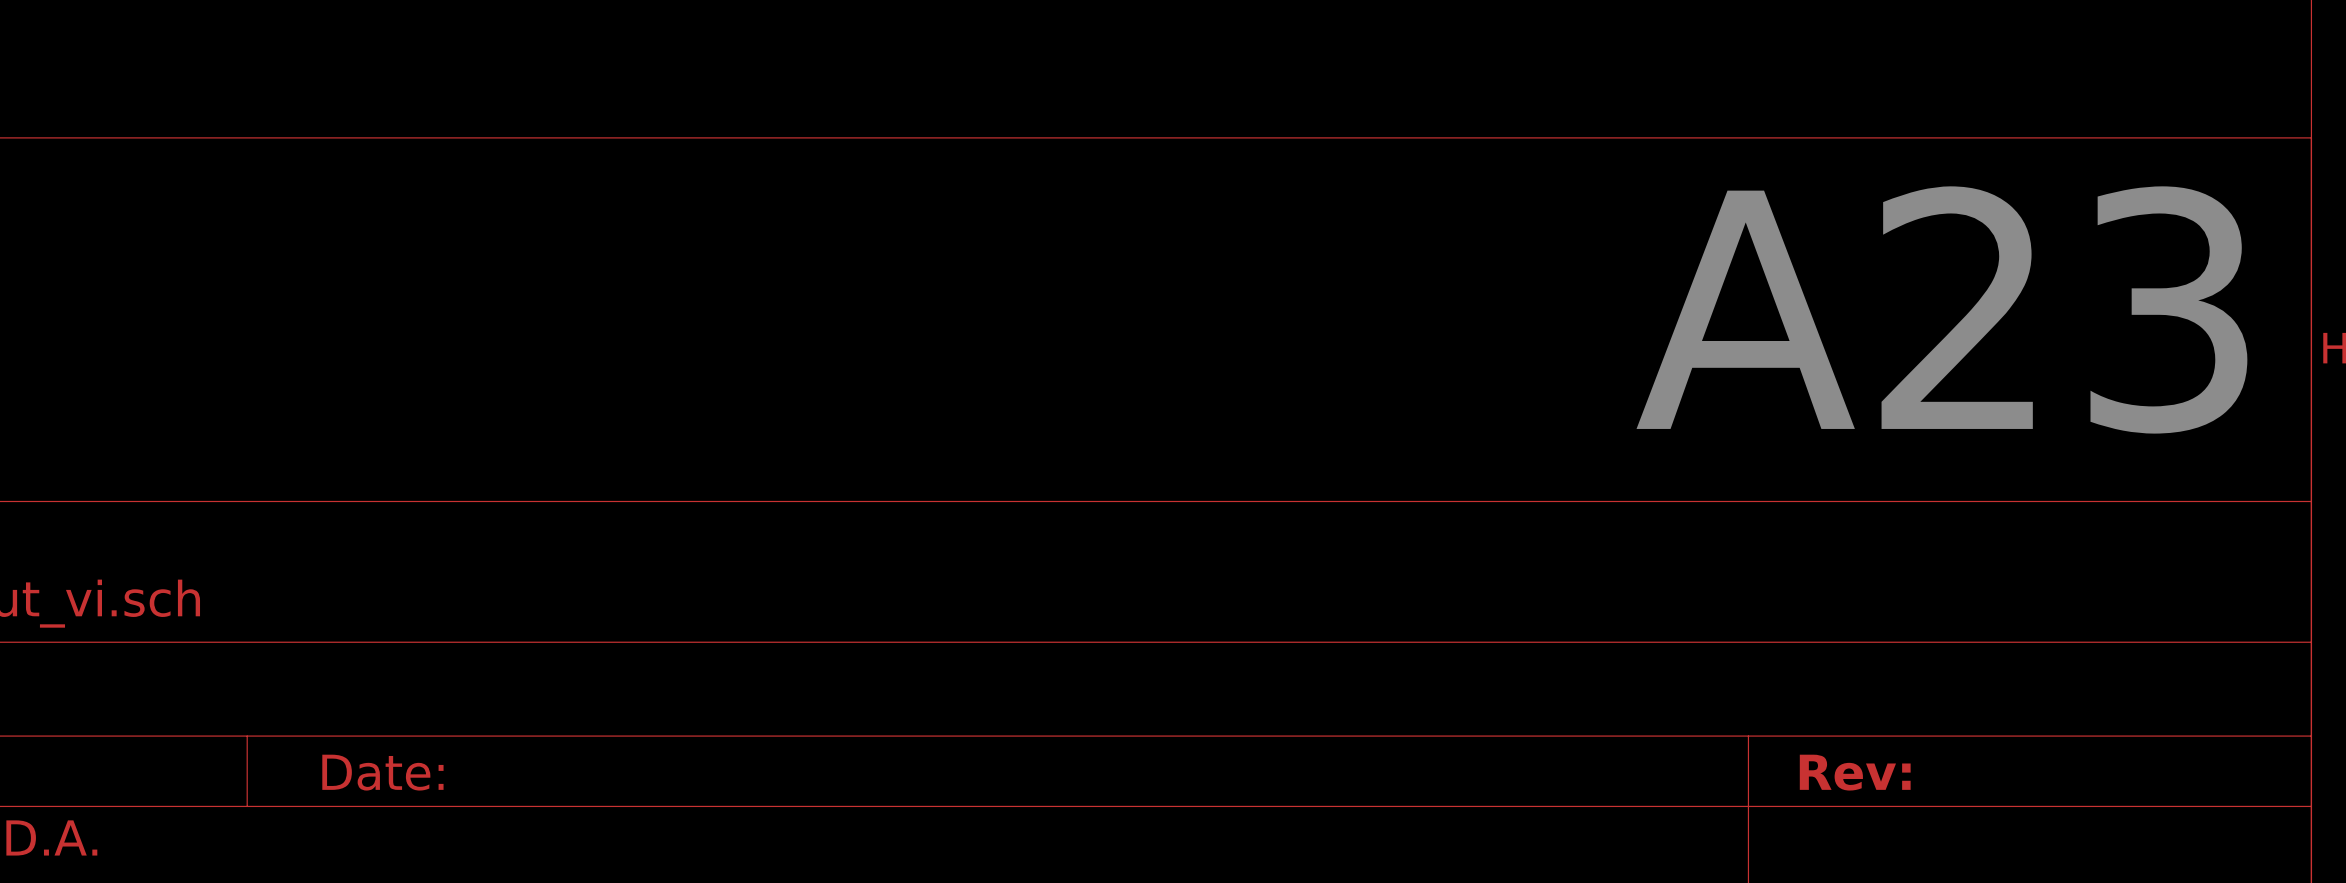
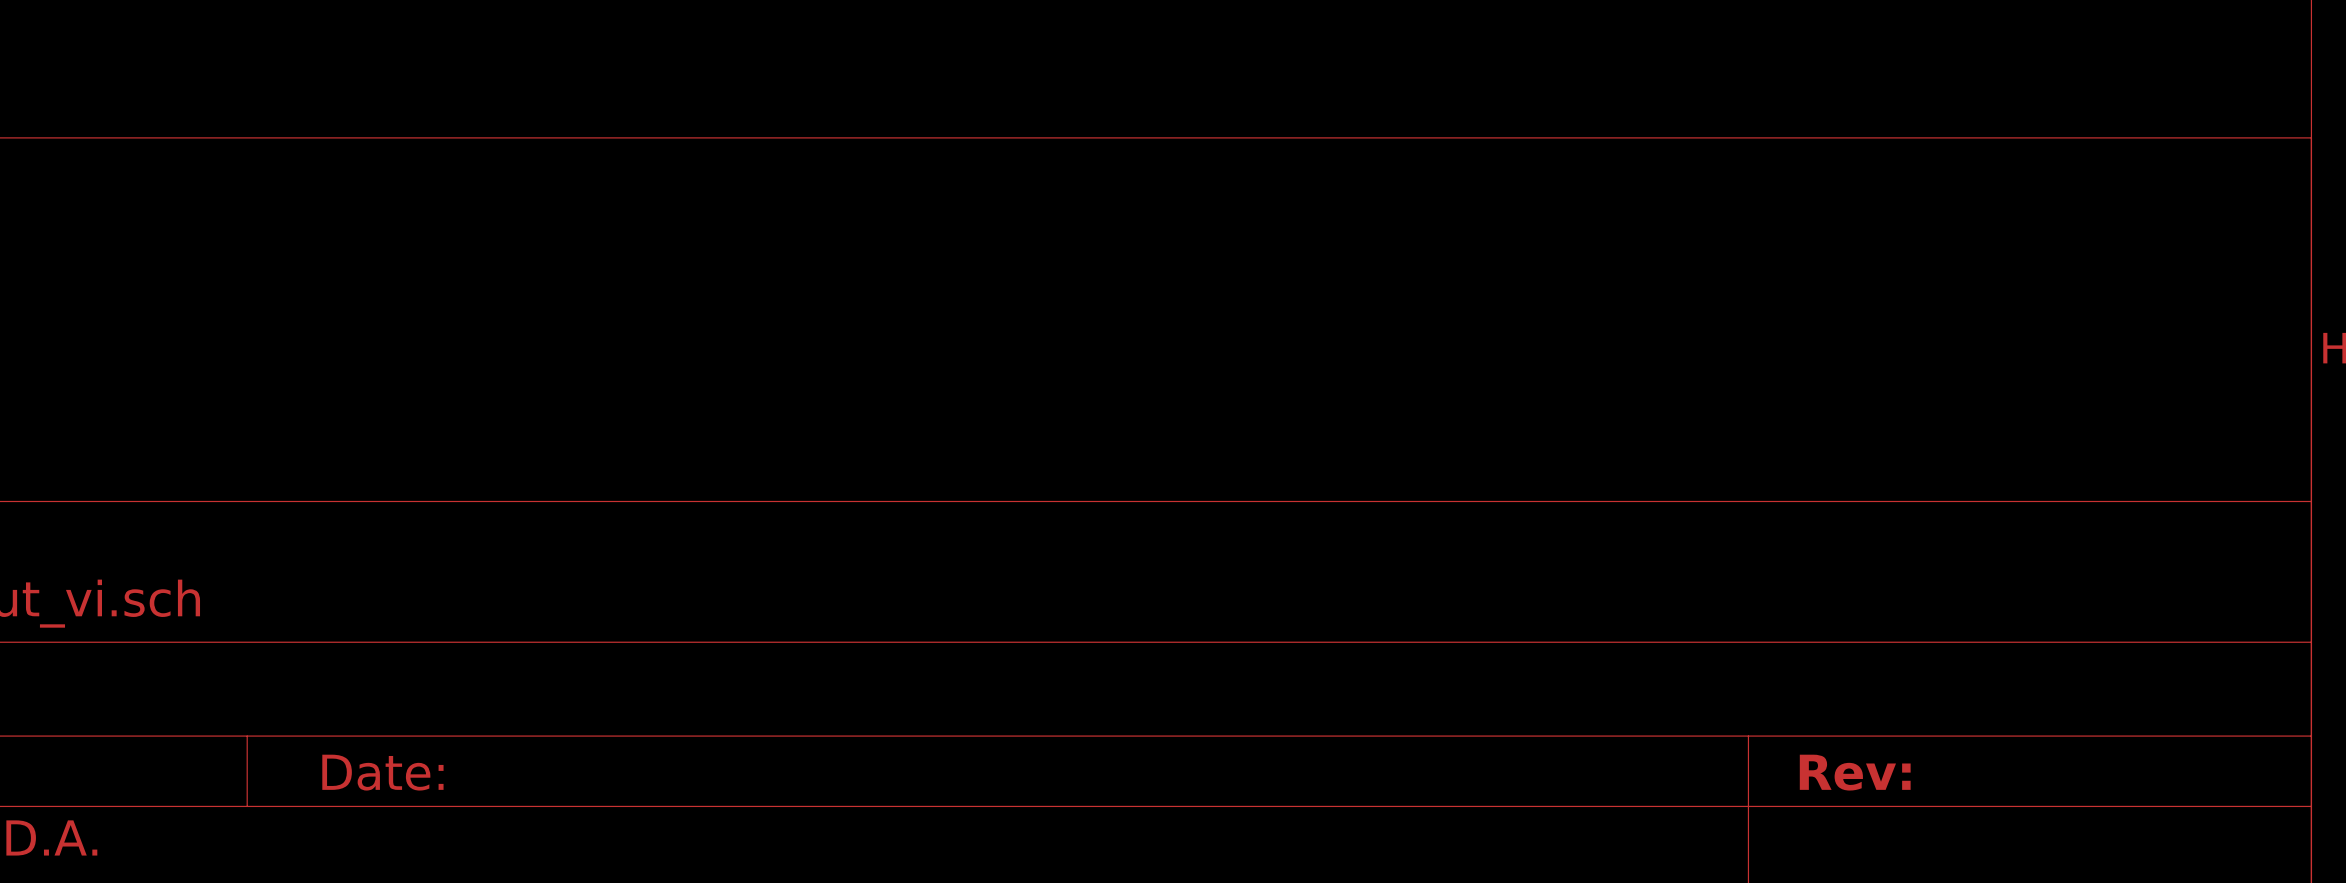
text: A23 (1941, 309) -> none

